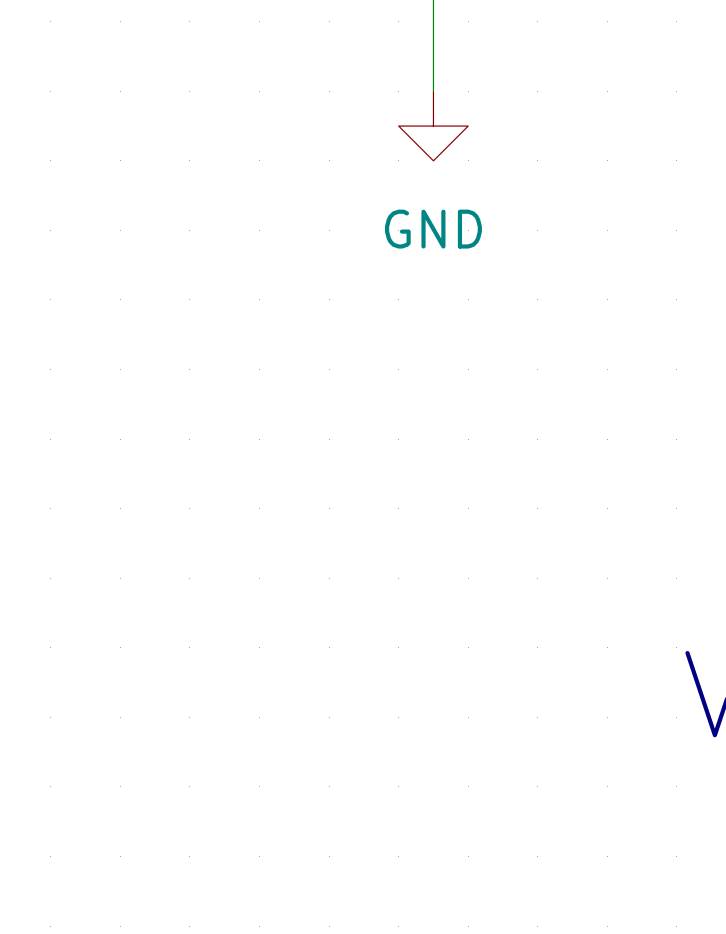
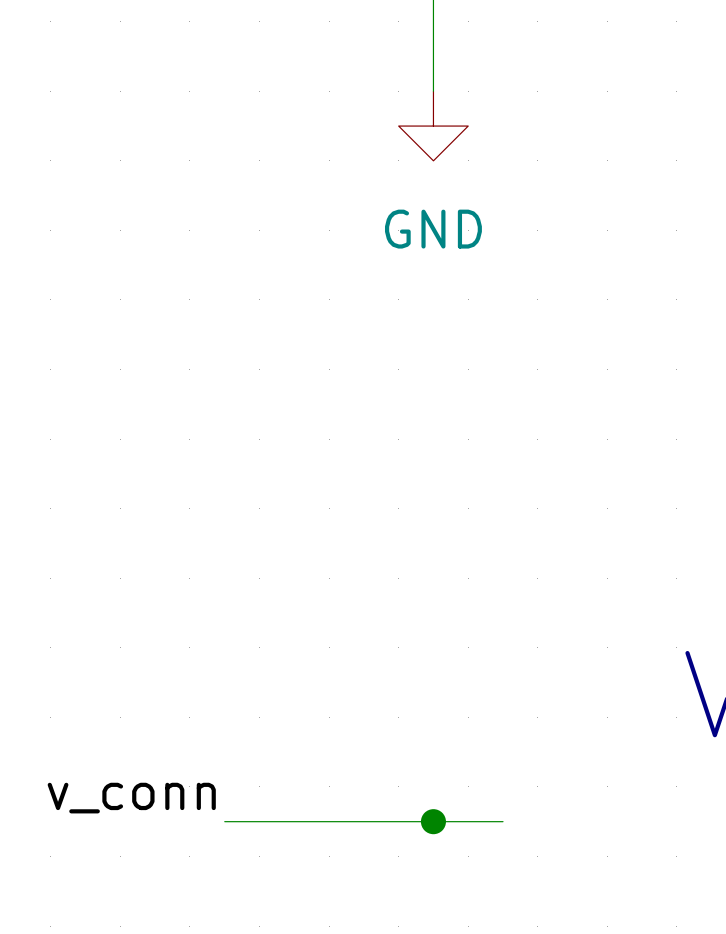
label: none -> v_conn (131, 798)
wire: none -> (224, 821) (503, 821)
junction: none -> (433, 821)

